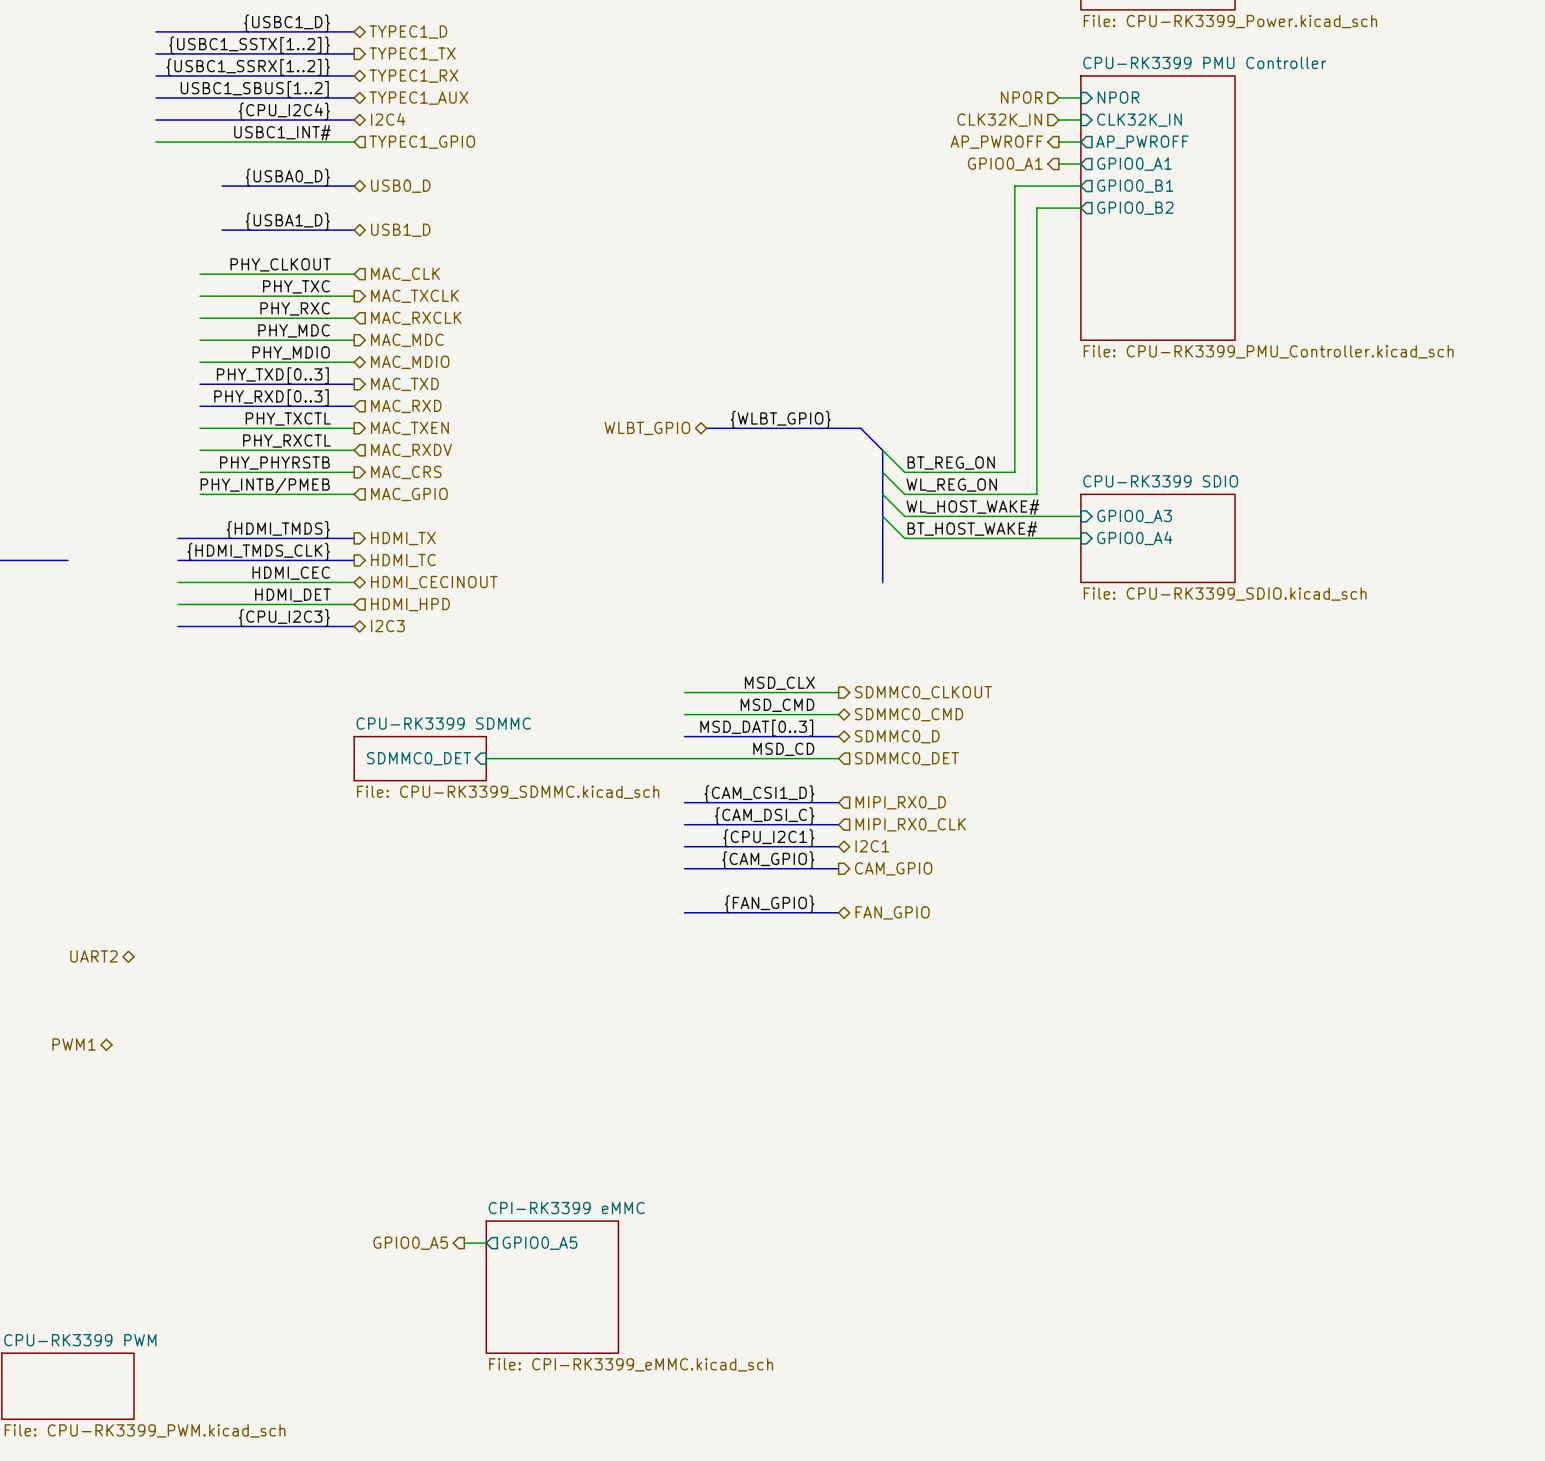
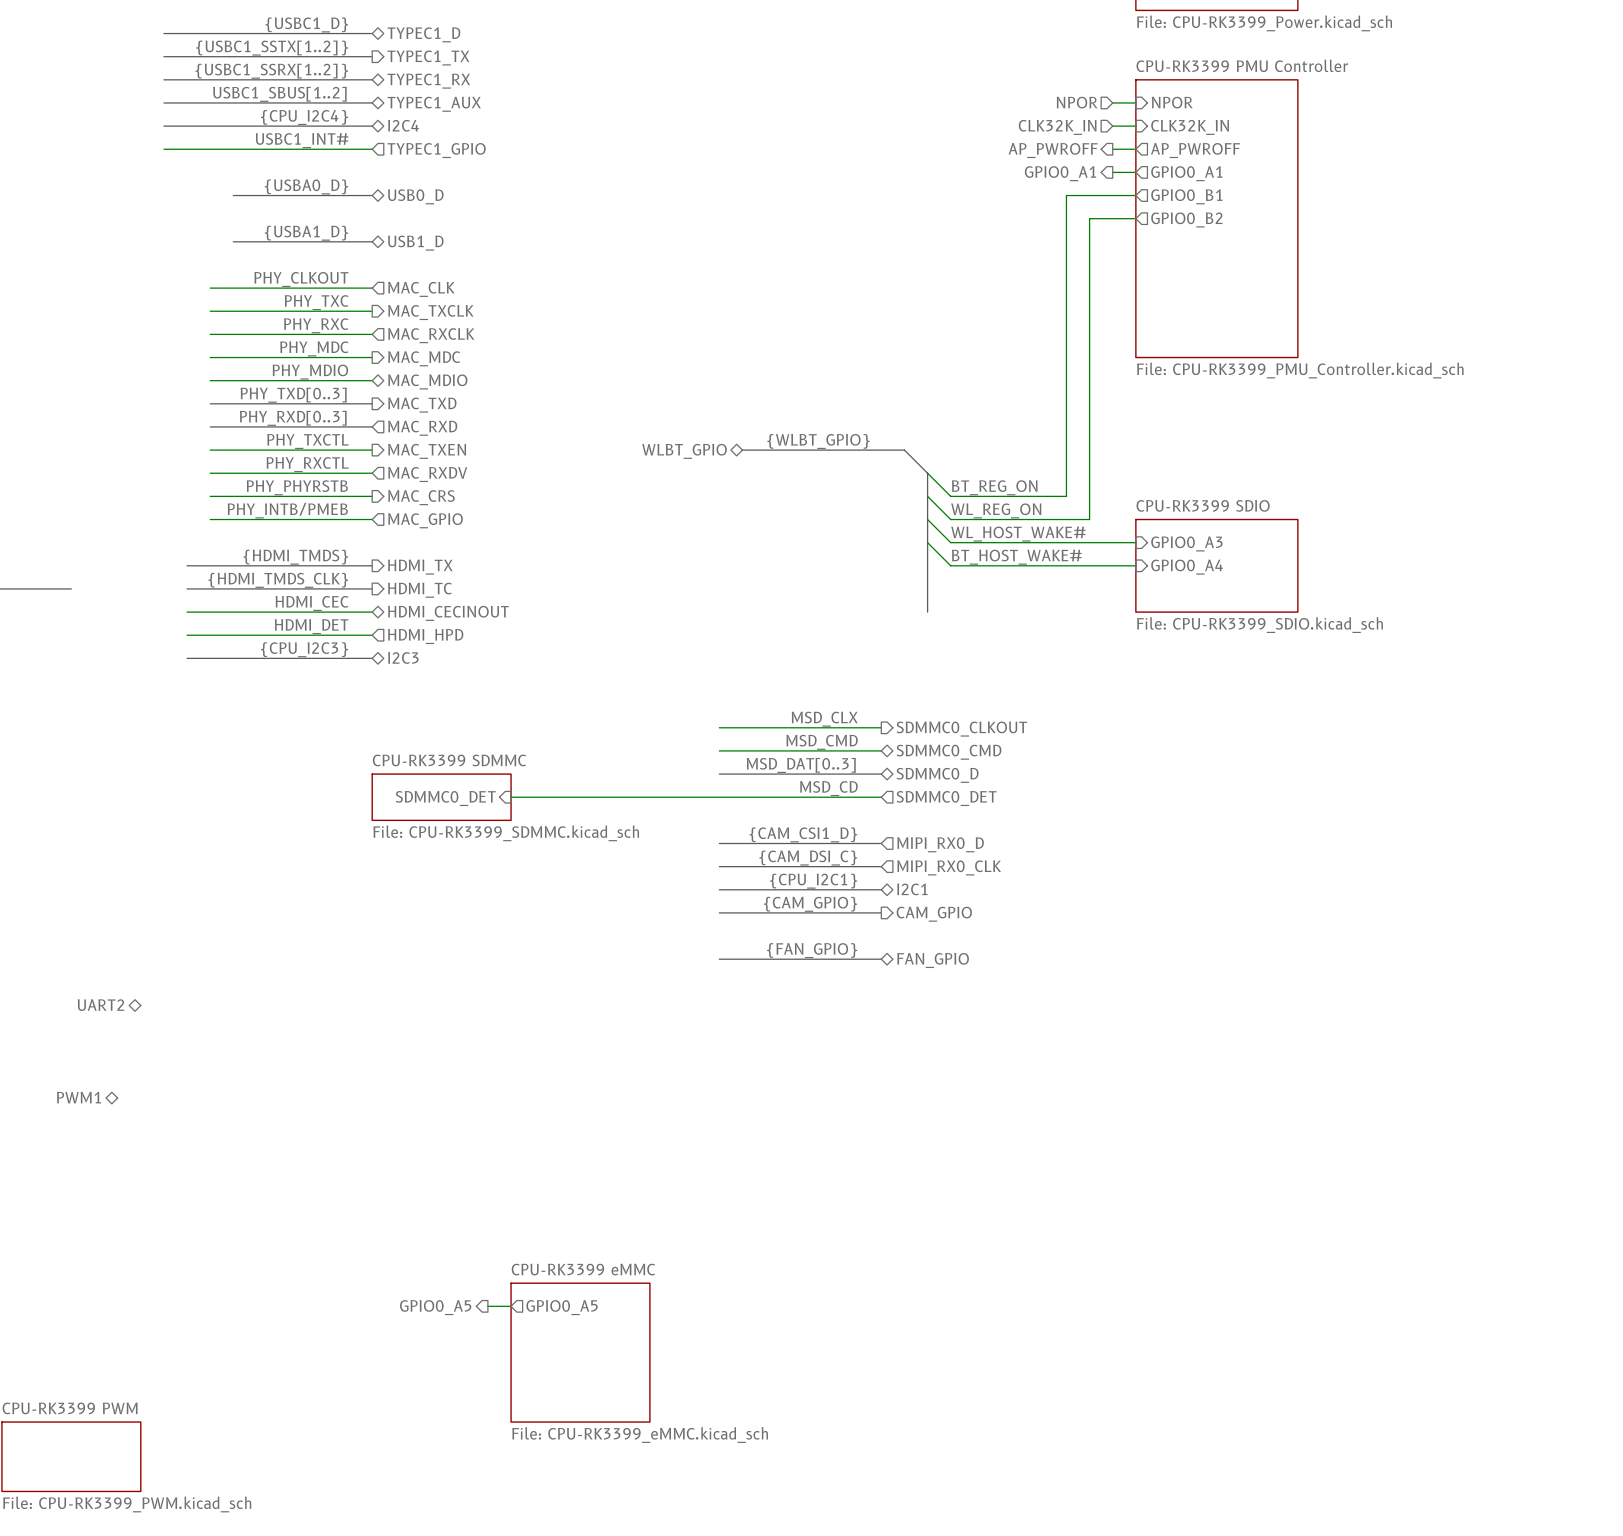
sheet CPI-RK3399 eMMC name: CPI-RK3399 eMMC (566, 1208) -> CPU-RK3399 eMMC (583, 1269)
sheet CPI-RK3399 eMMC value: File: CPI-RK3399_eMMC.kicad_sch (631, 1364) -> File: CPU-RK3399_eMMC.kicad_sch (640, 1435)

